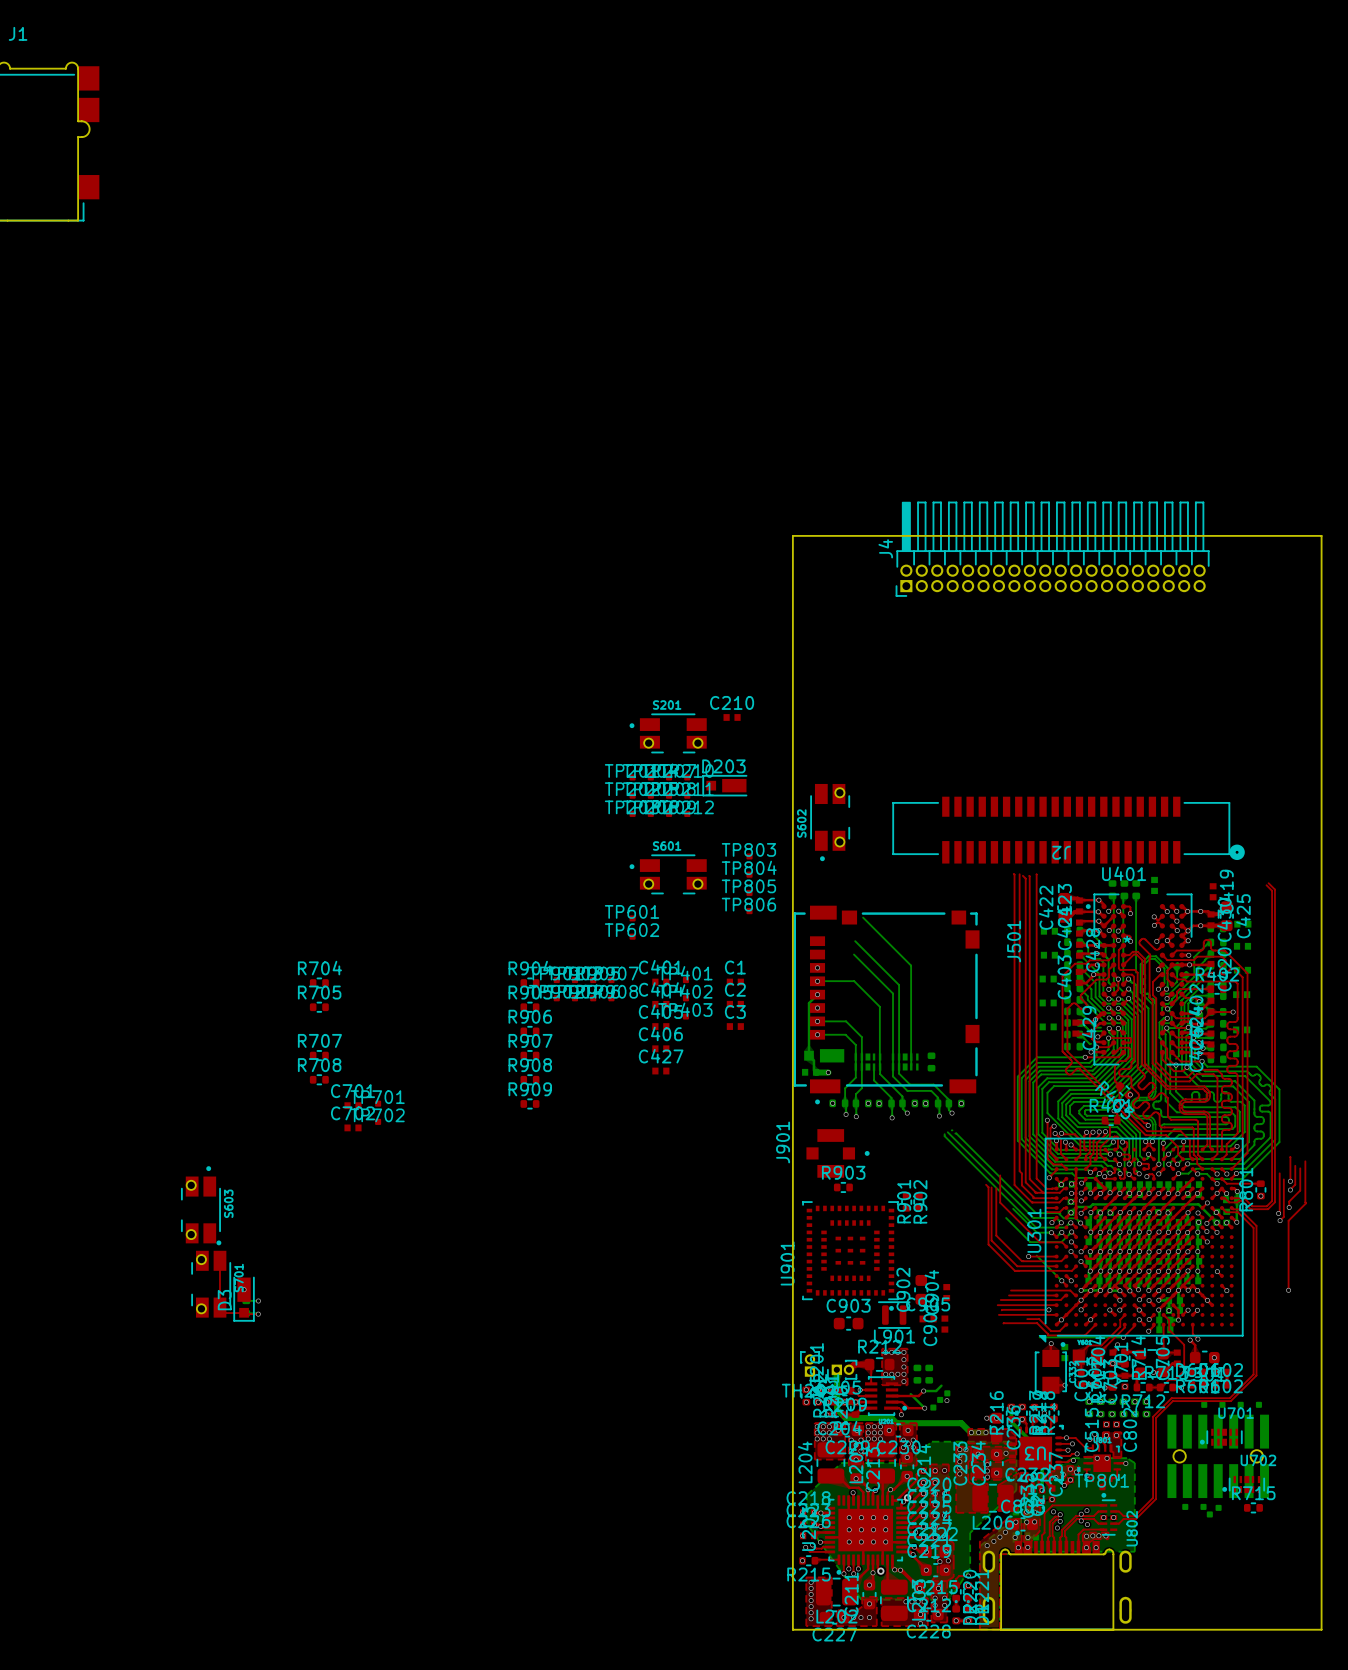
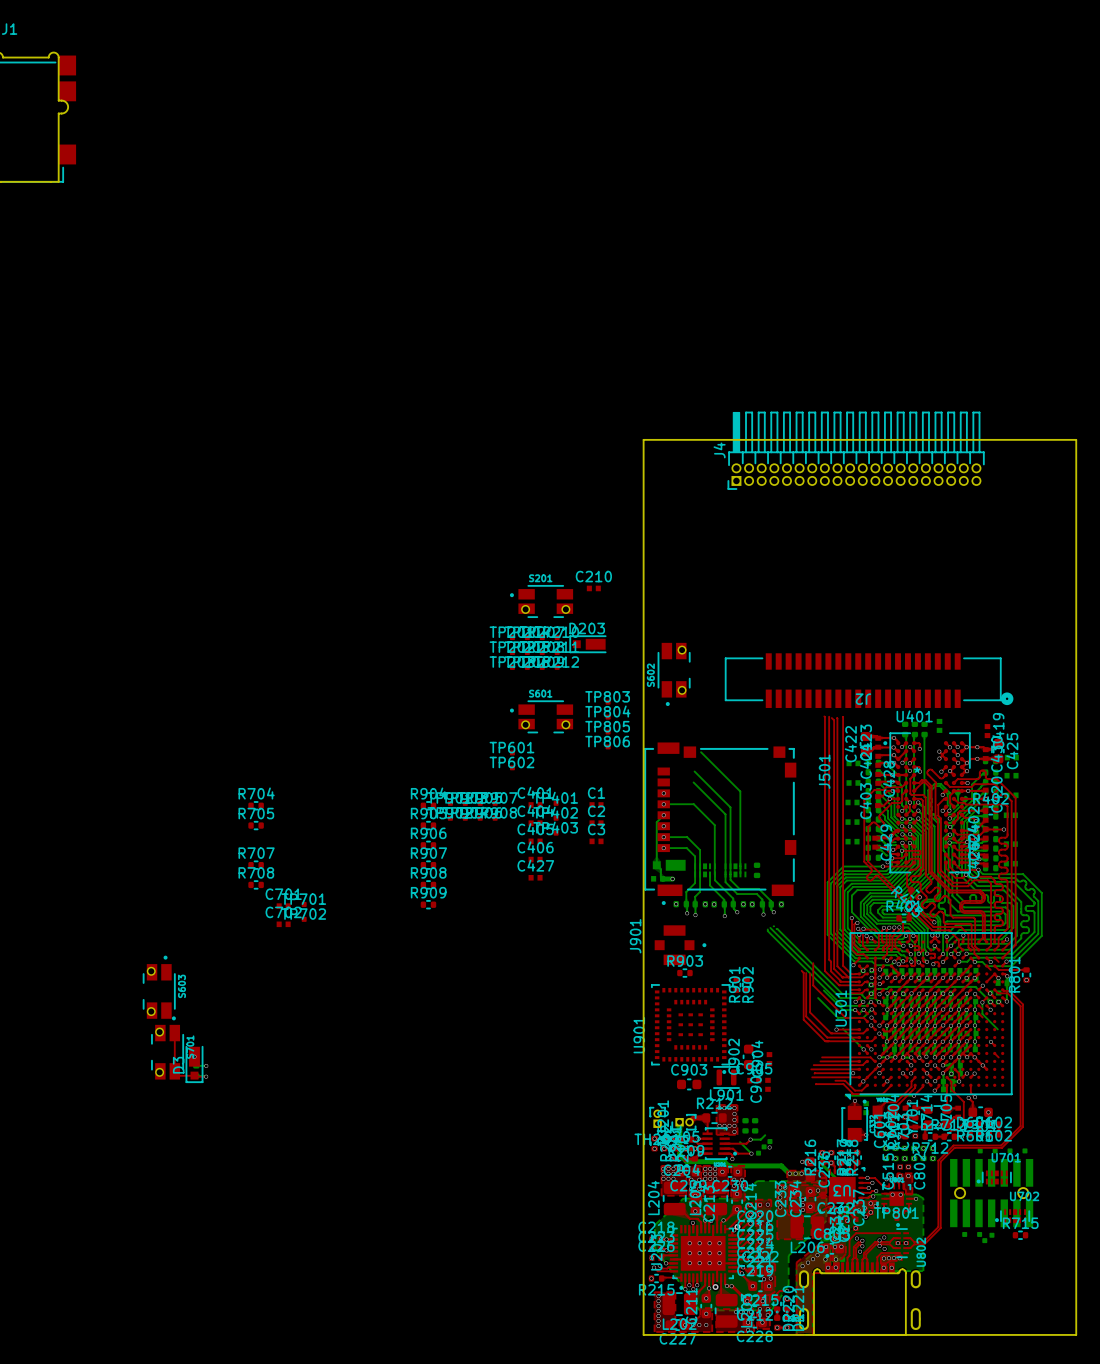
top track: (1268, 883) (1274, 889) (1274, 1202) (1268, 1209) (1250, 1209) (1242, 1200) (1229, 1202) (1224, 1198) (1221, 1198) -> none
top track: (1266, 885) (1272, 890) (1272, 1201) (1266, 1206) (1252, 1206) (1244, 1198) (1231, 1198) -> none
top track: (1290, 1157) (1290, 1181) -> none
top track: (1305, 1161) (1306, 1203) -> none
top track: (1295, 1165) (1295, 1184) (1290, 1190) -> none
top track: (1300, 1168) (1300, 1190) (1289, 1201) (1289, 1207) -> none
via: (1226, 1173) -> none
top track: (1279, 1173) (1278, 1213) -> none
top track: (1283, 1179) (1283, 1216) (1280, 1220) -> none
via: (1290, 1181) -> none
via: (1217, 1183) -> none
via: (1290, 1190) -> none
via: (1217, 1193) -> none
top track: (1306, 1203) (1288, 1220) (1288, 1290) -> none
via: (1289, 1207) -> none
via: (1278, 1213) -> none
via: (1280, 1220) -> none
via: (1198, 1222) -> none
bottom track: none -> (982, 1002) (982, 1013) (997, 1029)
via: (1206, 1231) -> none
via: (1207, 1241) -> none
via: (1226, 1290) -> none
via: (1288, 1290) -> none

